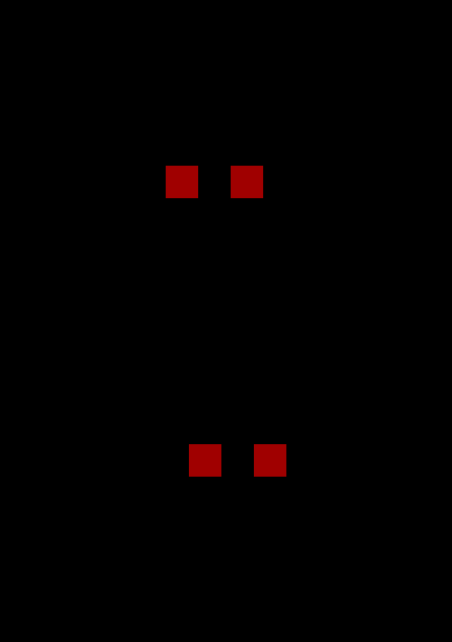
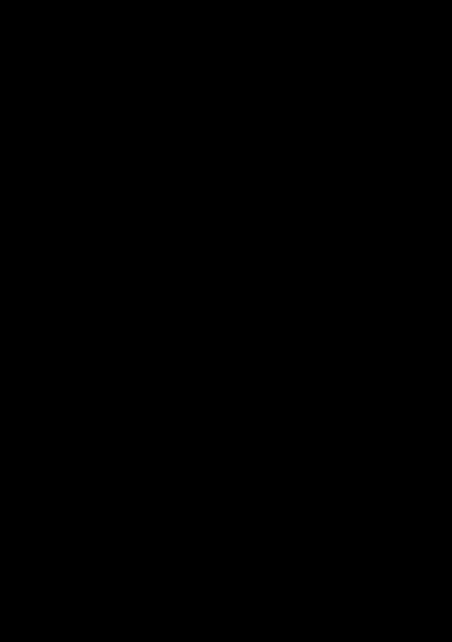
part: (214, 181) -> none
part: (237, 460) -> none

